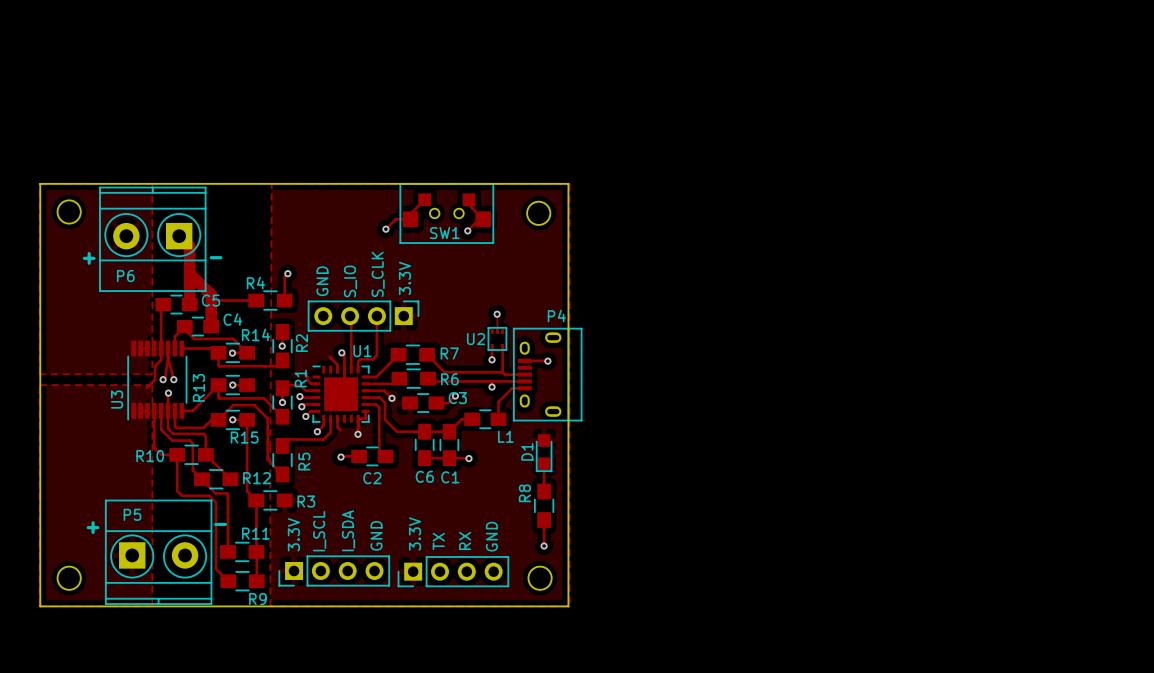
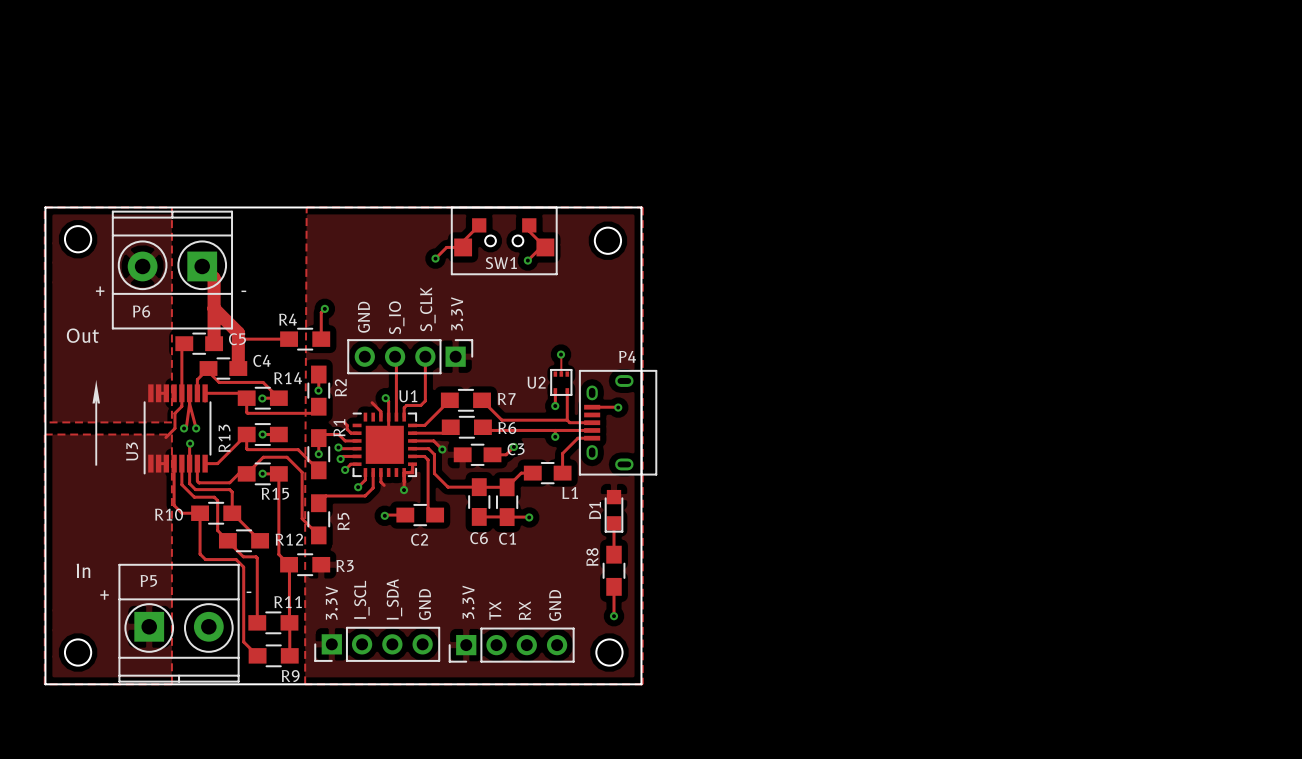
text: none -> Out (82, 335)
text: none -> ↑ (96, 422)
text: none -> In (83, 570)

